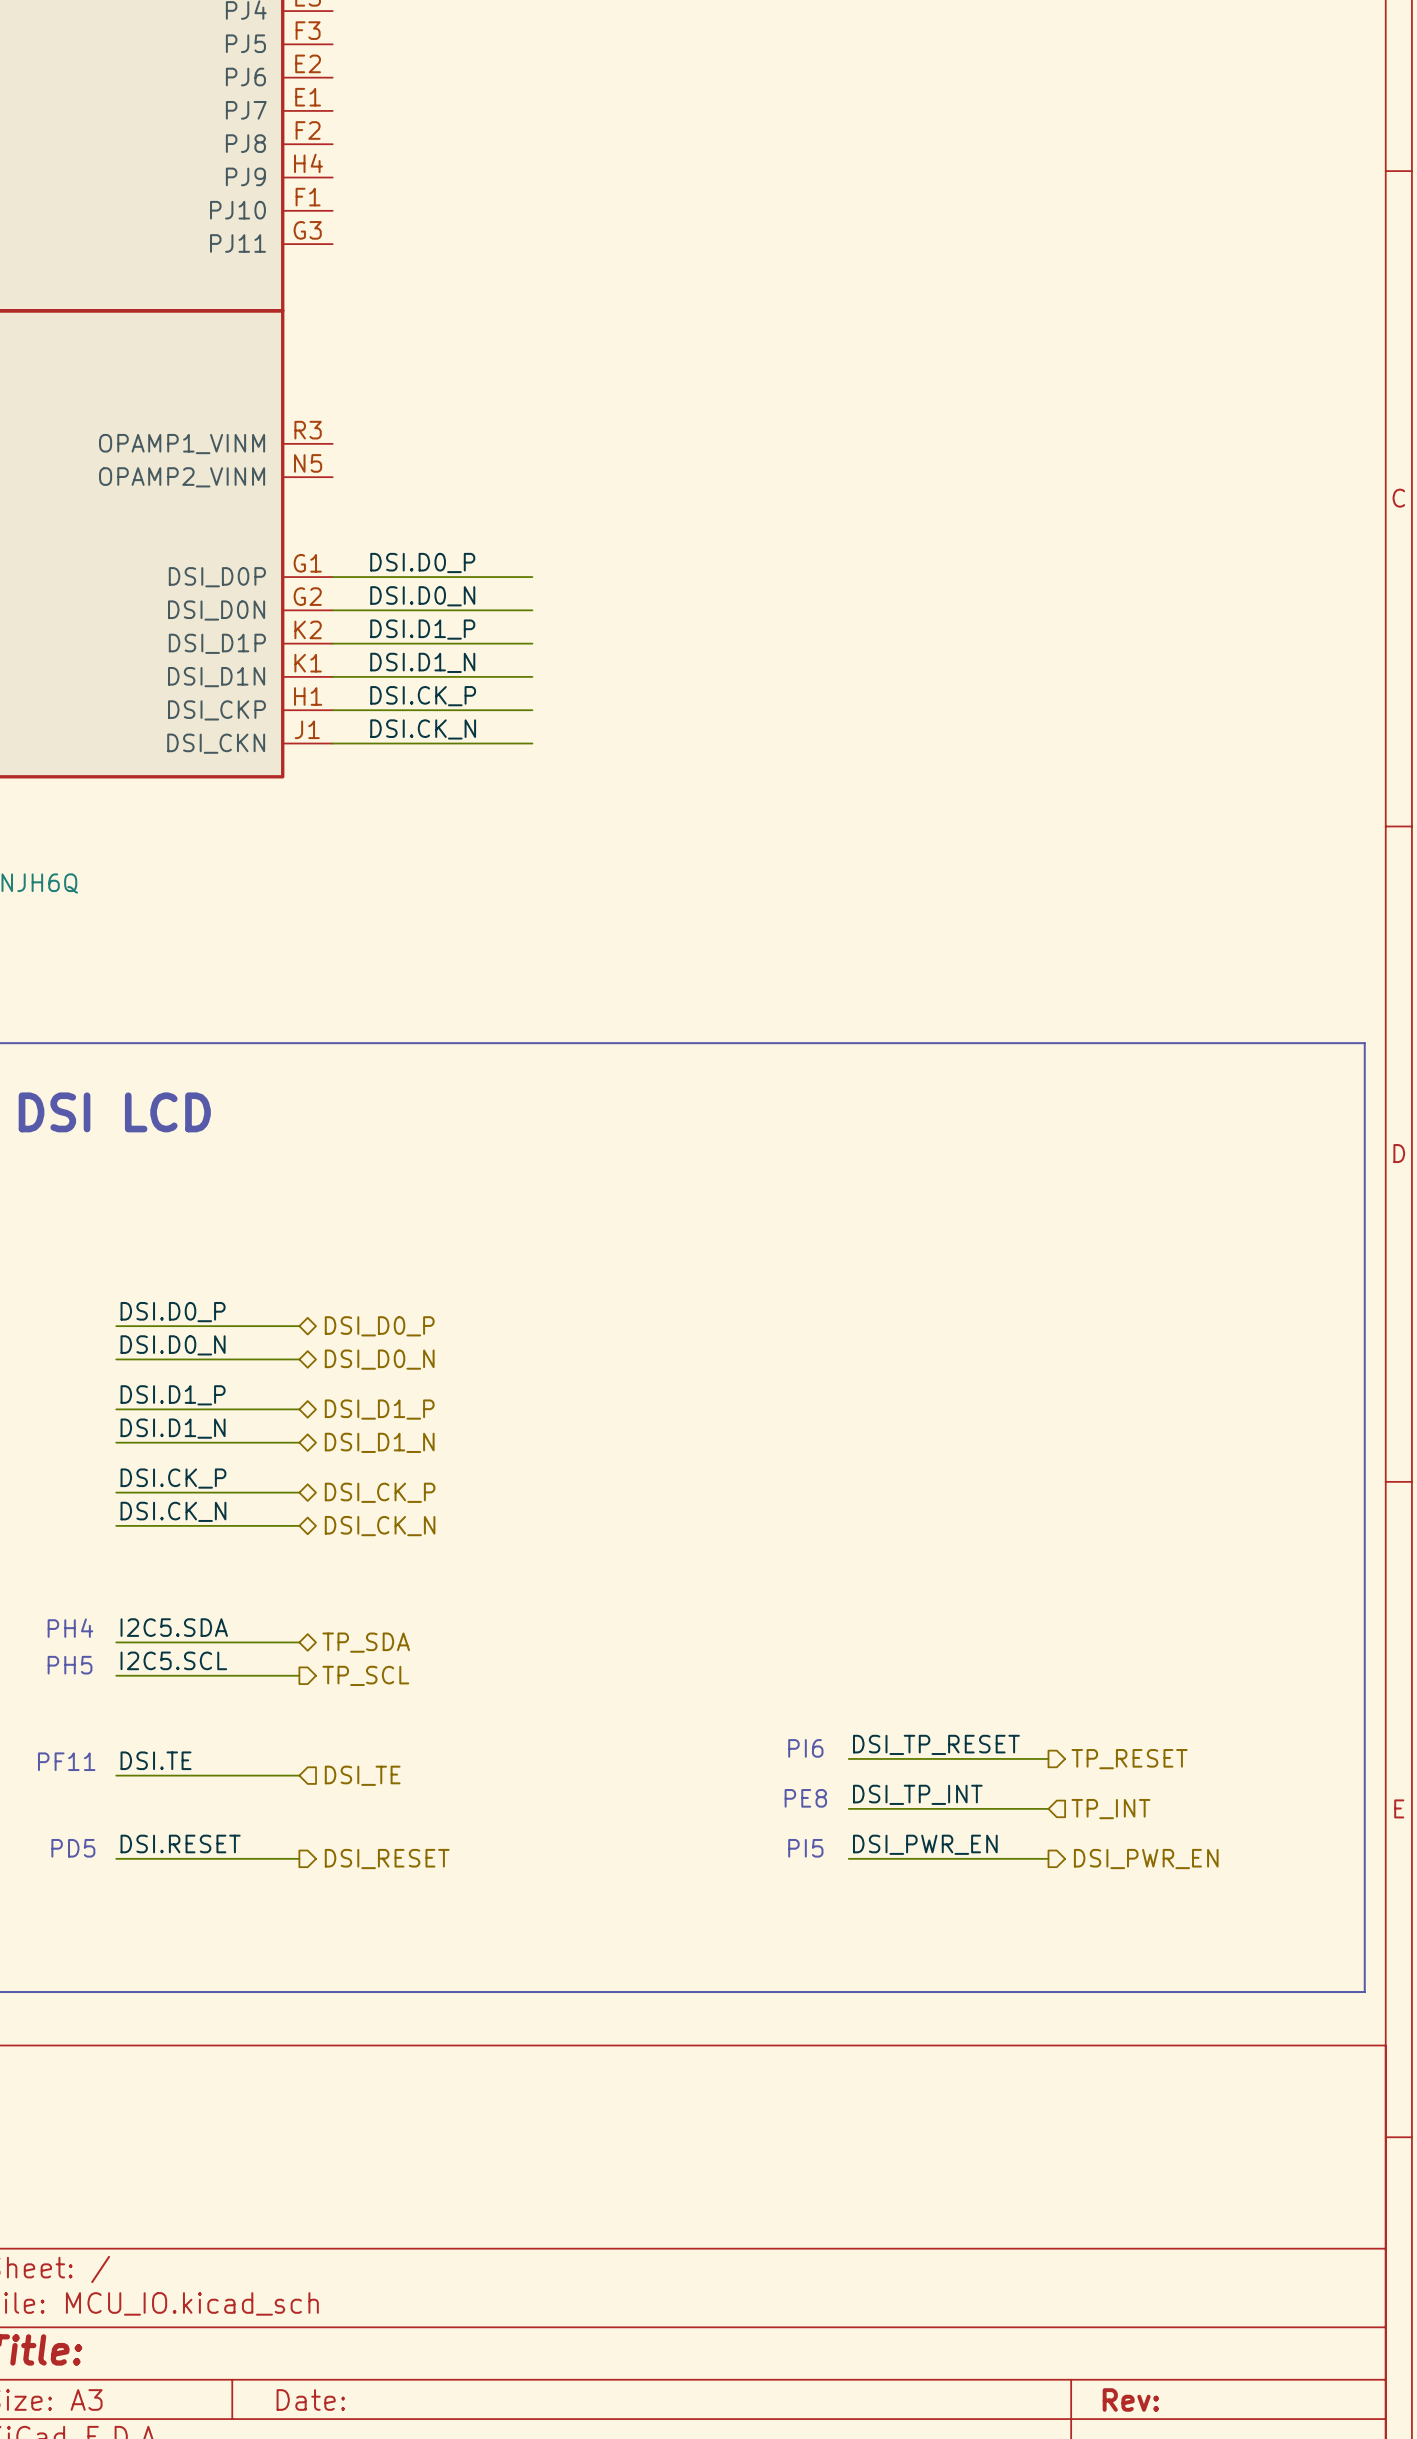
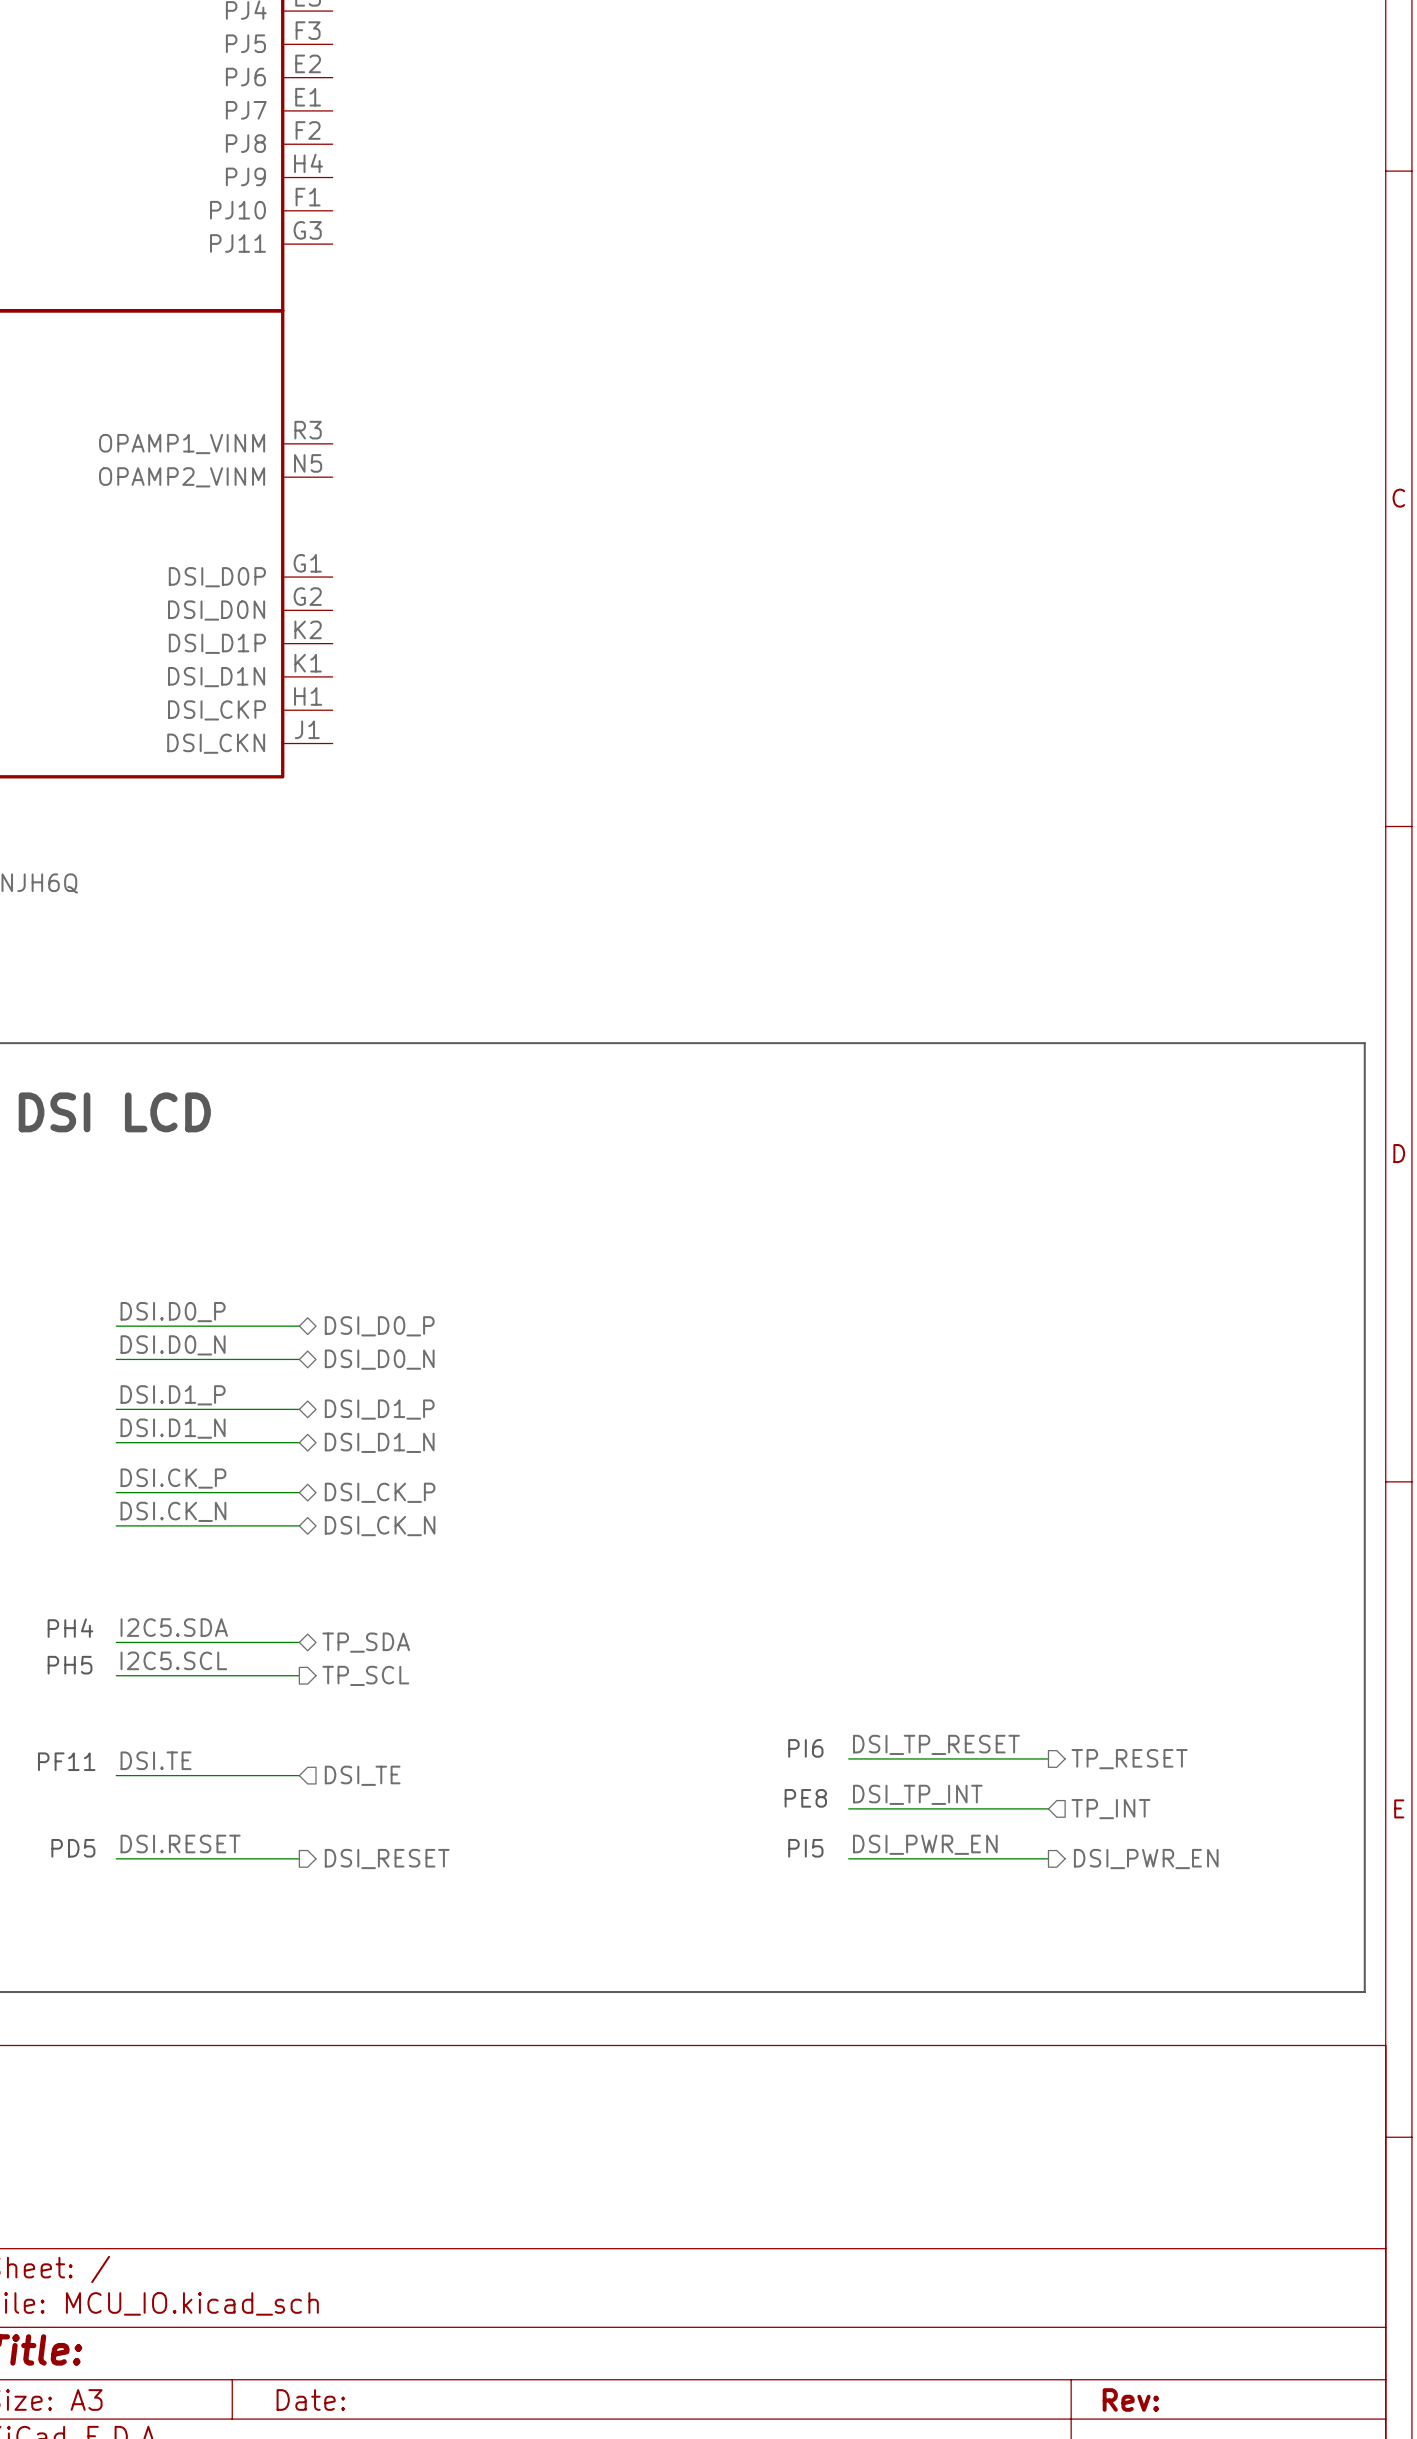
label: DSI.D0_P (422, 562) -> none
wire: (332, 577) (532, 577) -> none
label: DSI.D0_N (422, 596) -> none
wire: (332, 610) (532, 610) -> none
label: DSI.D1_P (422, 629) -> none
wire: (332, 643) (532, 643) -> none
label: DSI.D1_N (422, 662) -> none
wire: (332, 676) (532, 676) -> none
label: DSI.CK_P (423, 696) -> none
wire: (332, 710) (532, 710) -> none
label: DSI.CK_N (423, 729) -> none
wire: (332, 743) (532, 743) -> none

